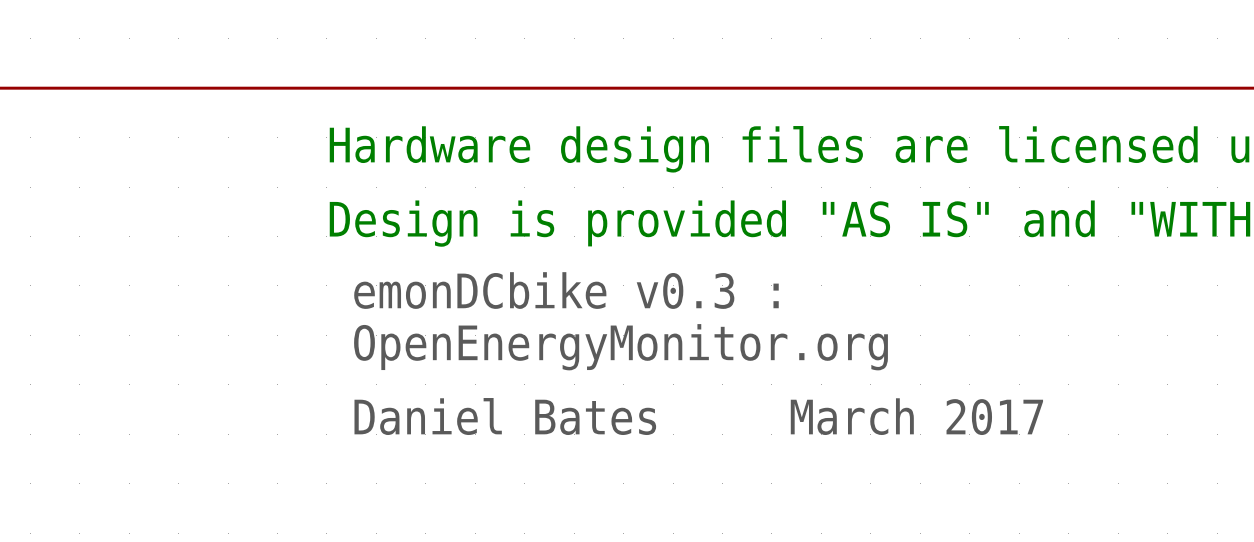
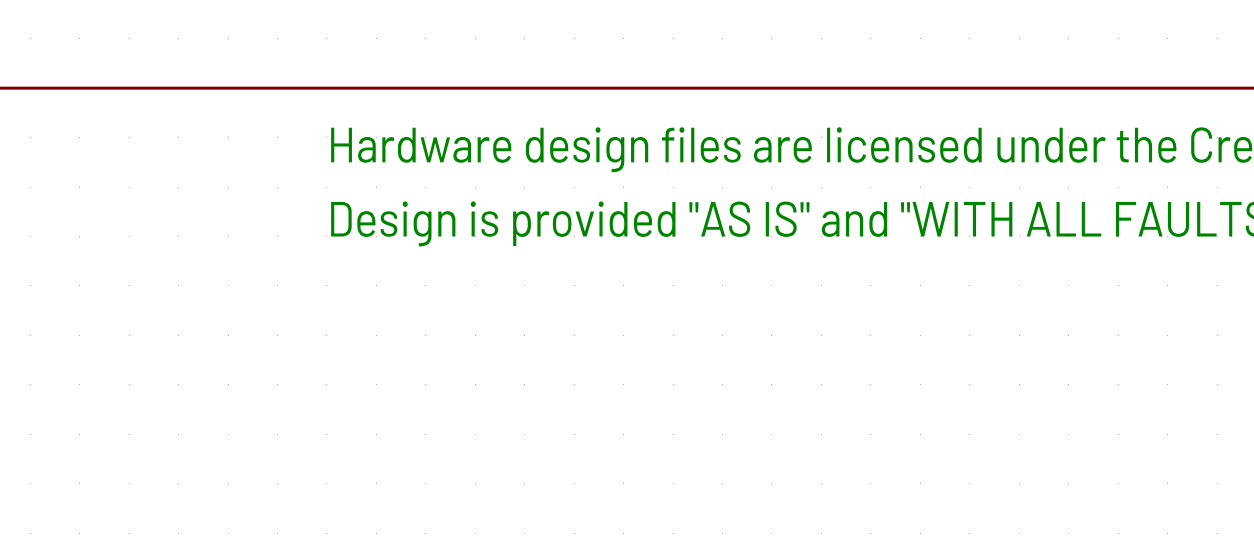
text: emonDCbike v0.3 : (566, 290) -> none
text: OpenEnergyMonitor.org (621, 347) -> none
text: Daniel Bates March 2017 (698, 416) -> none

